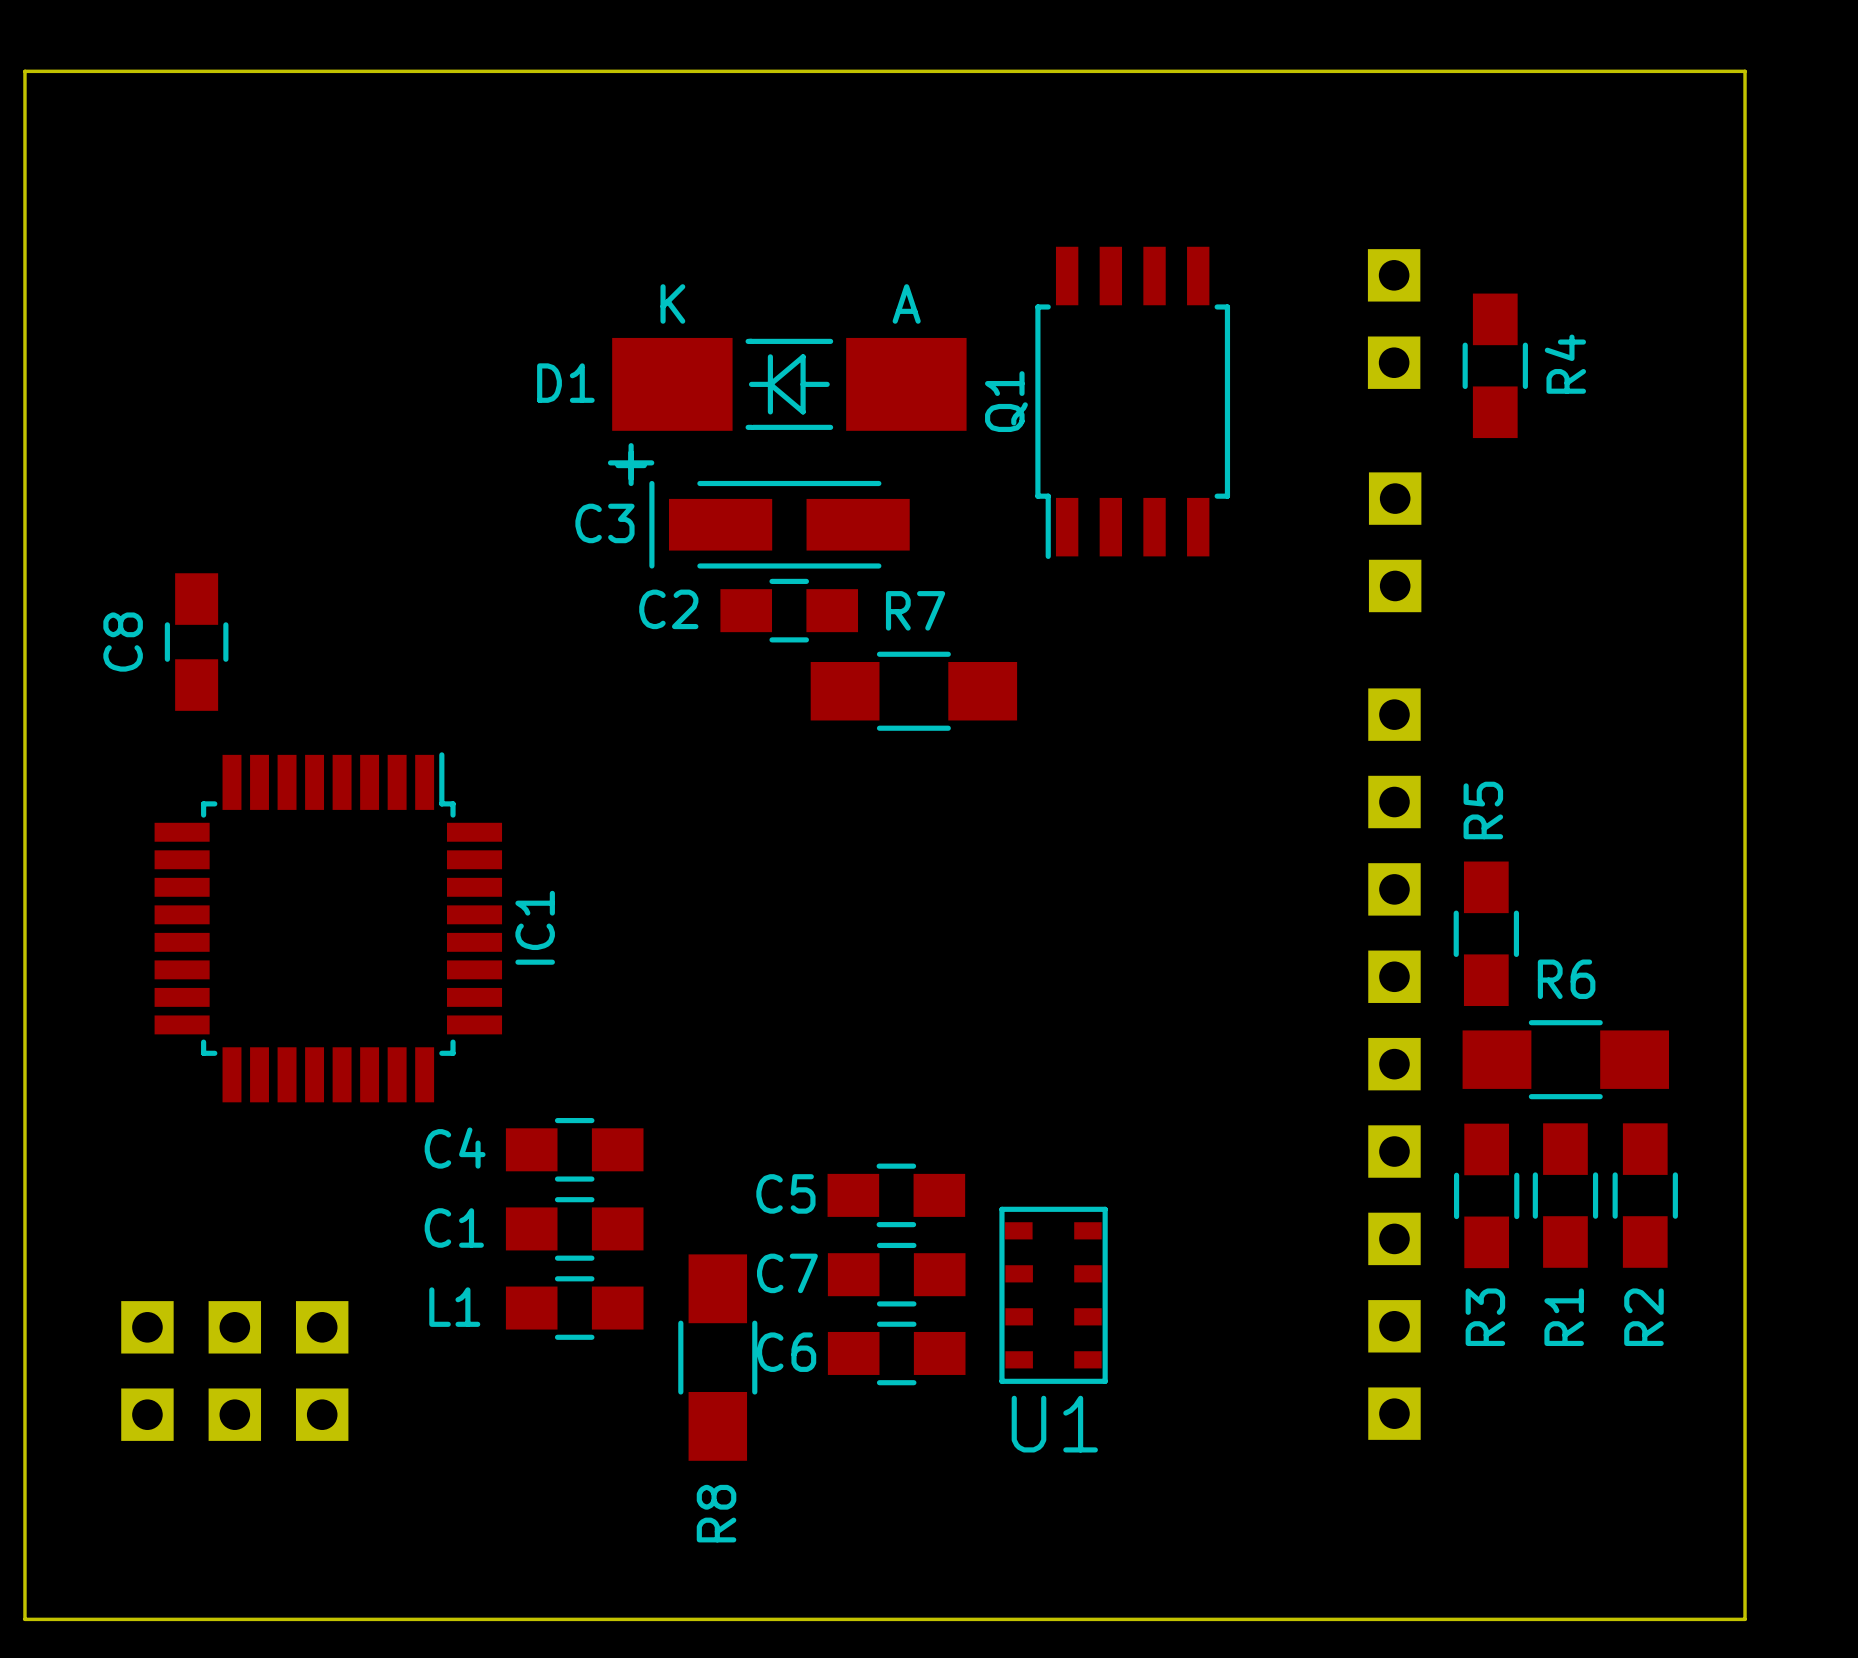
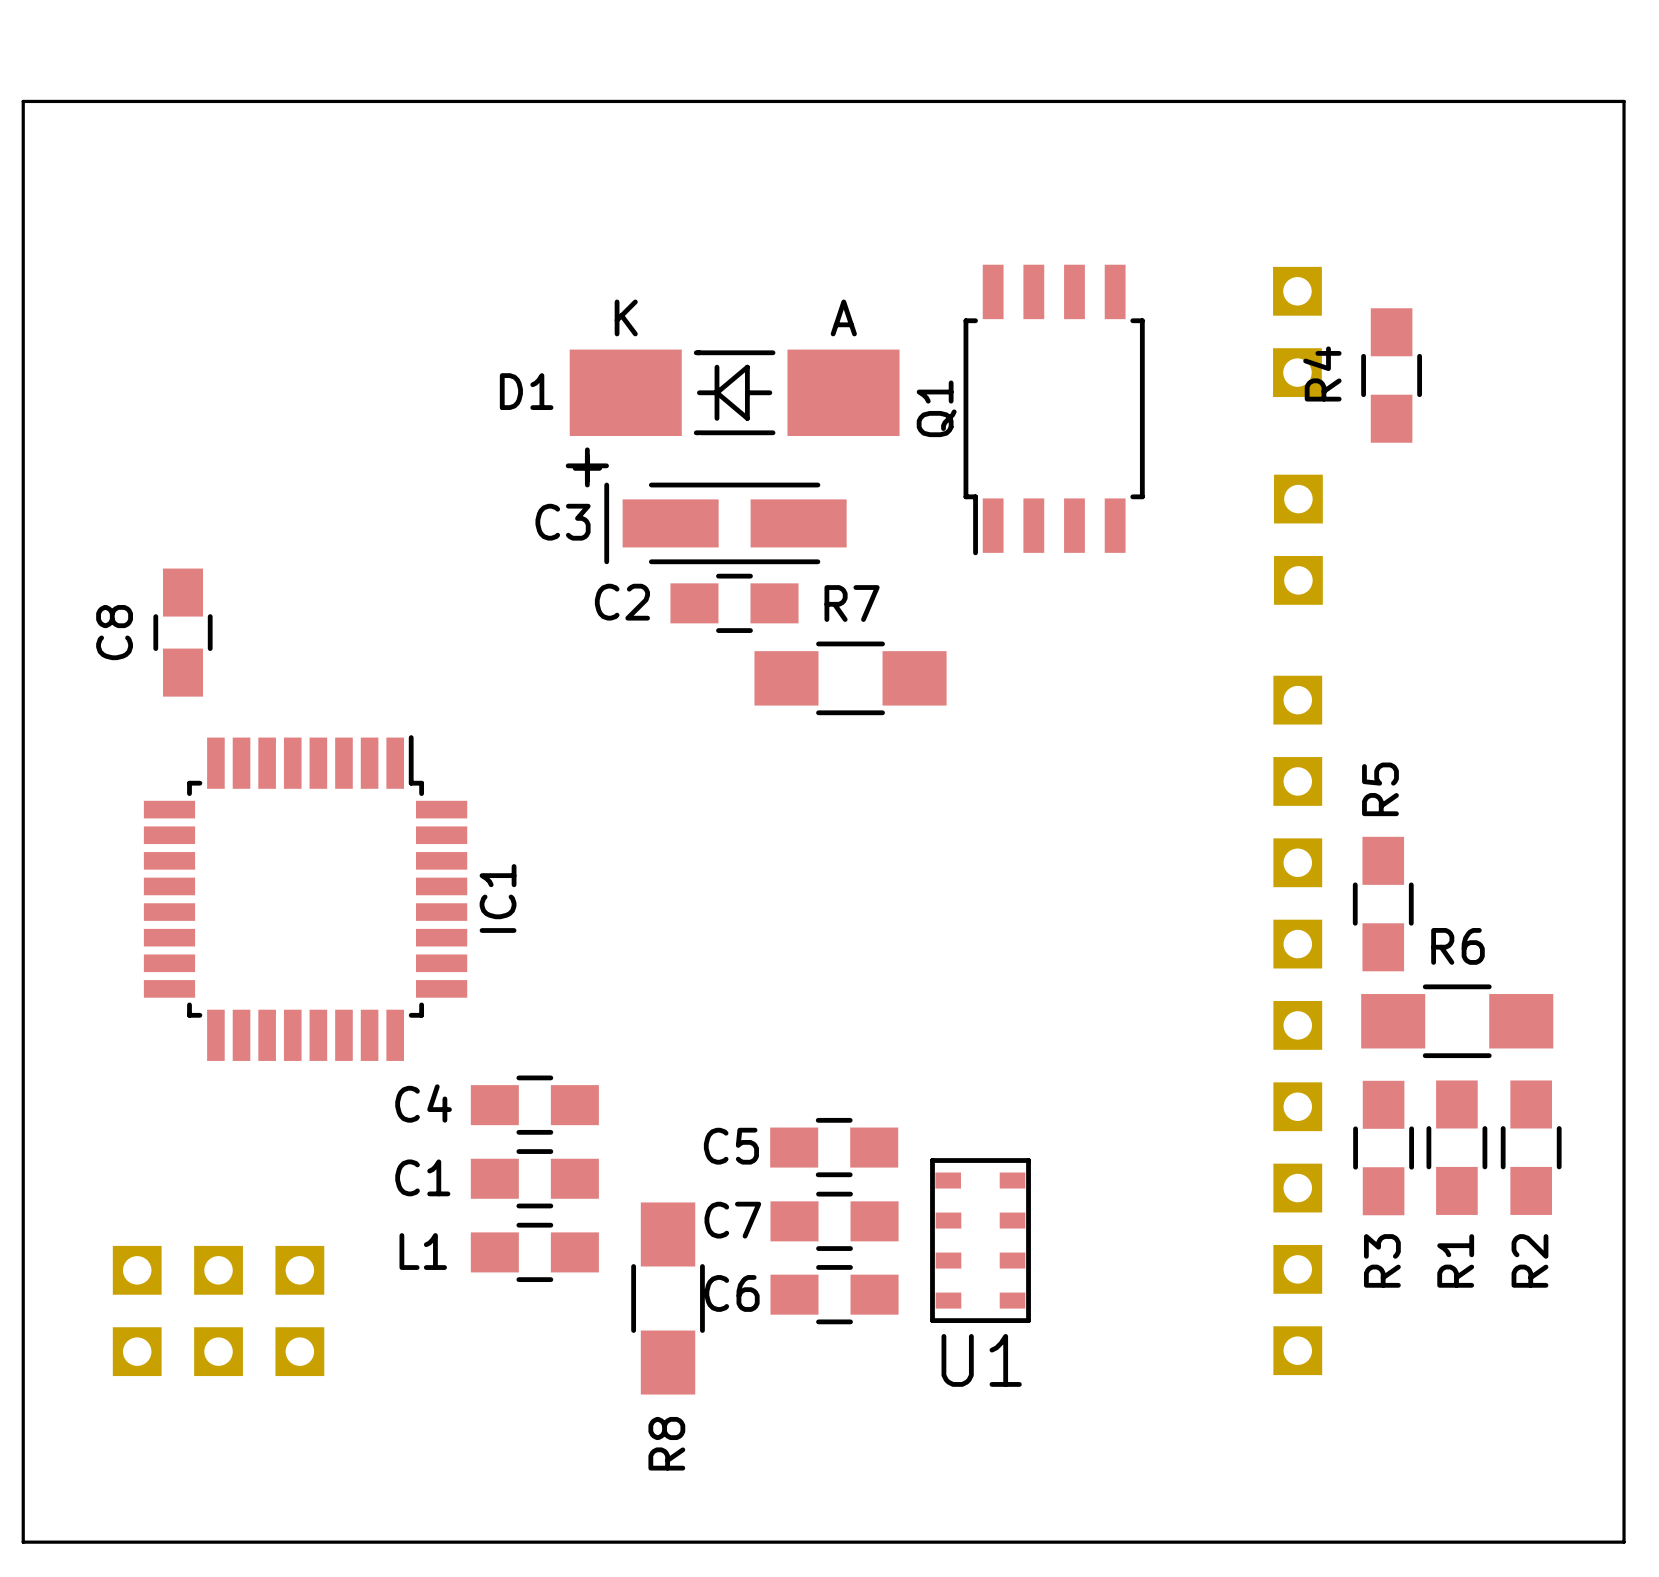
R4 name position: R4 (1565, 364) -> R4 (1322, 373)

